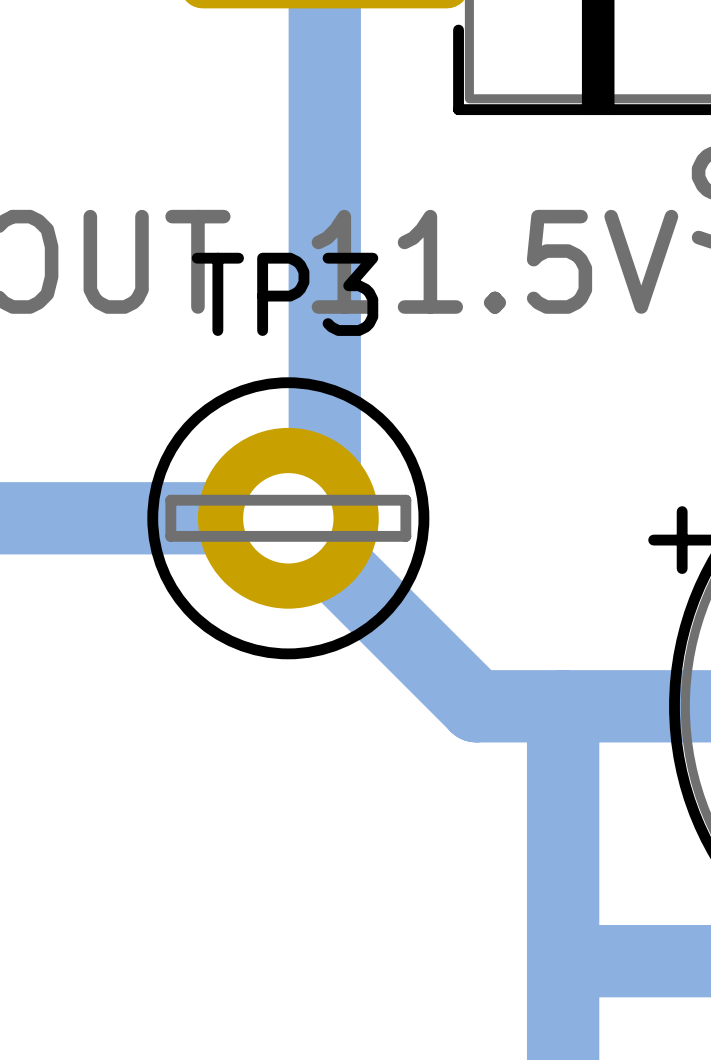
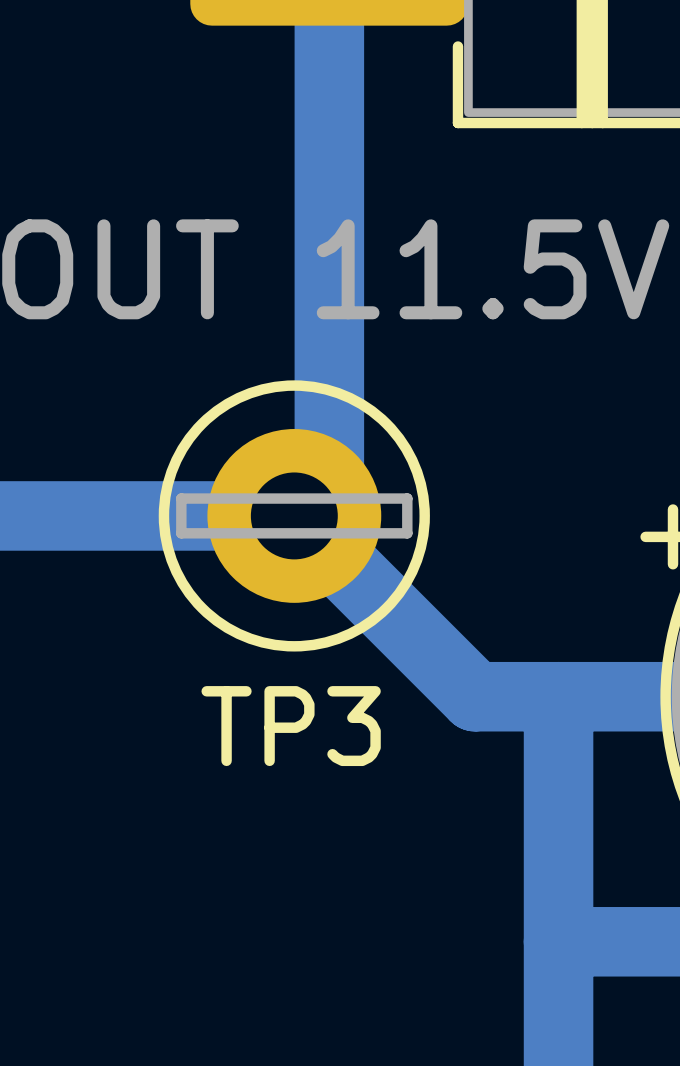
TP3 name position: TP3 (285, 294) -> TP3 (291, 726)

